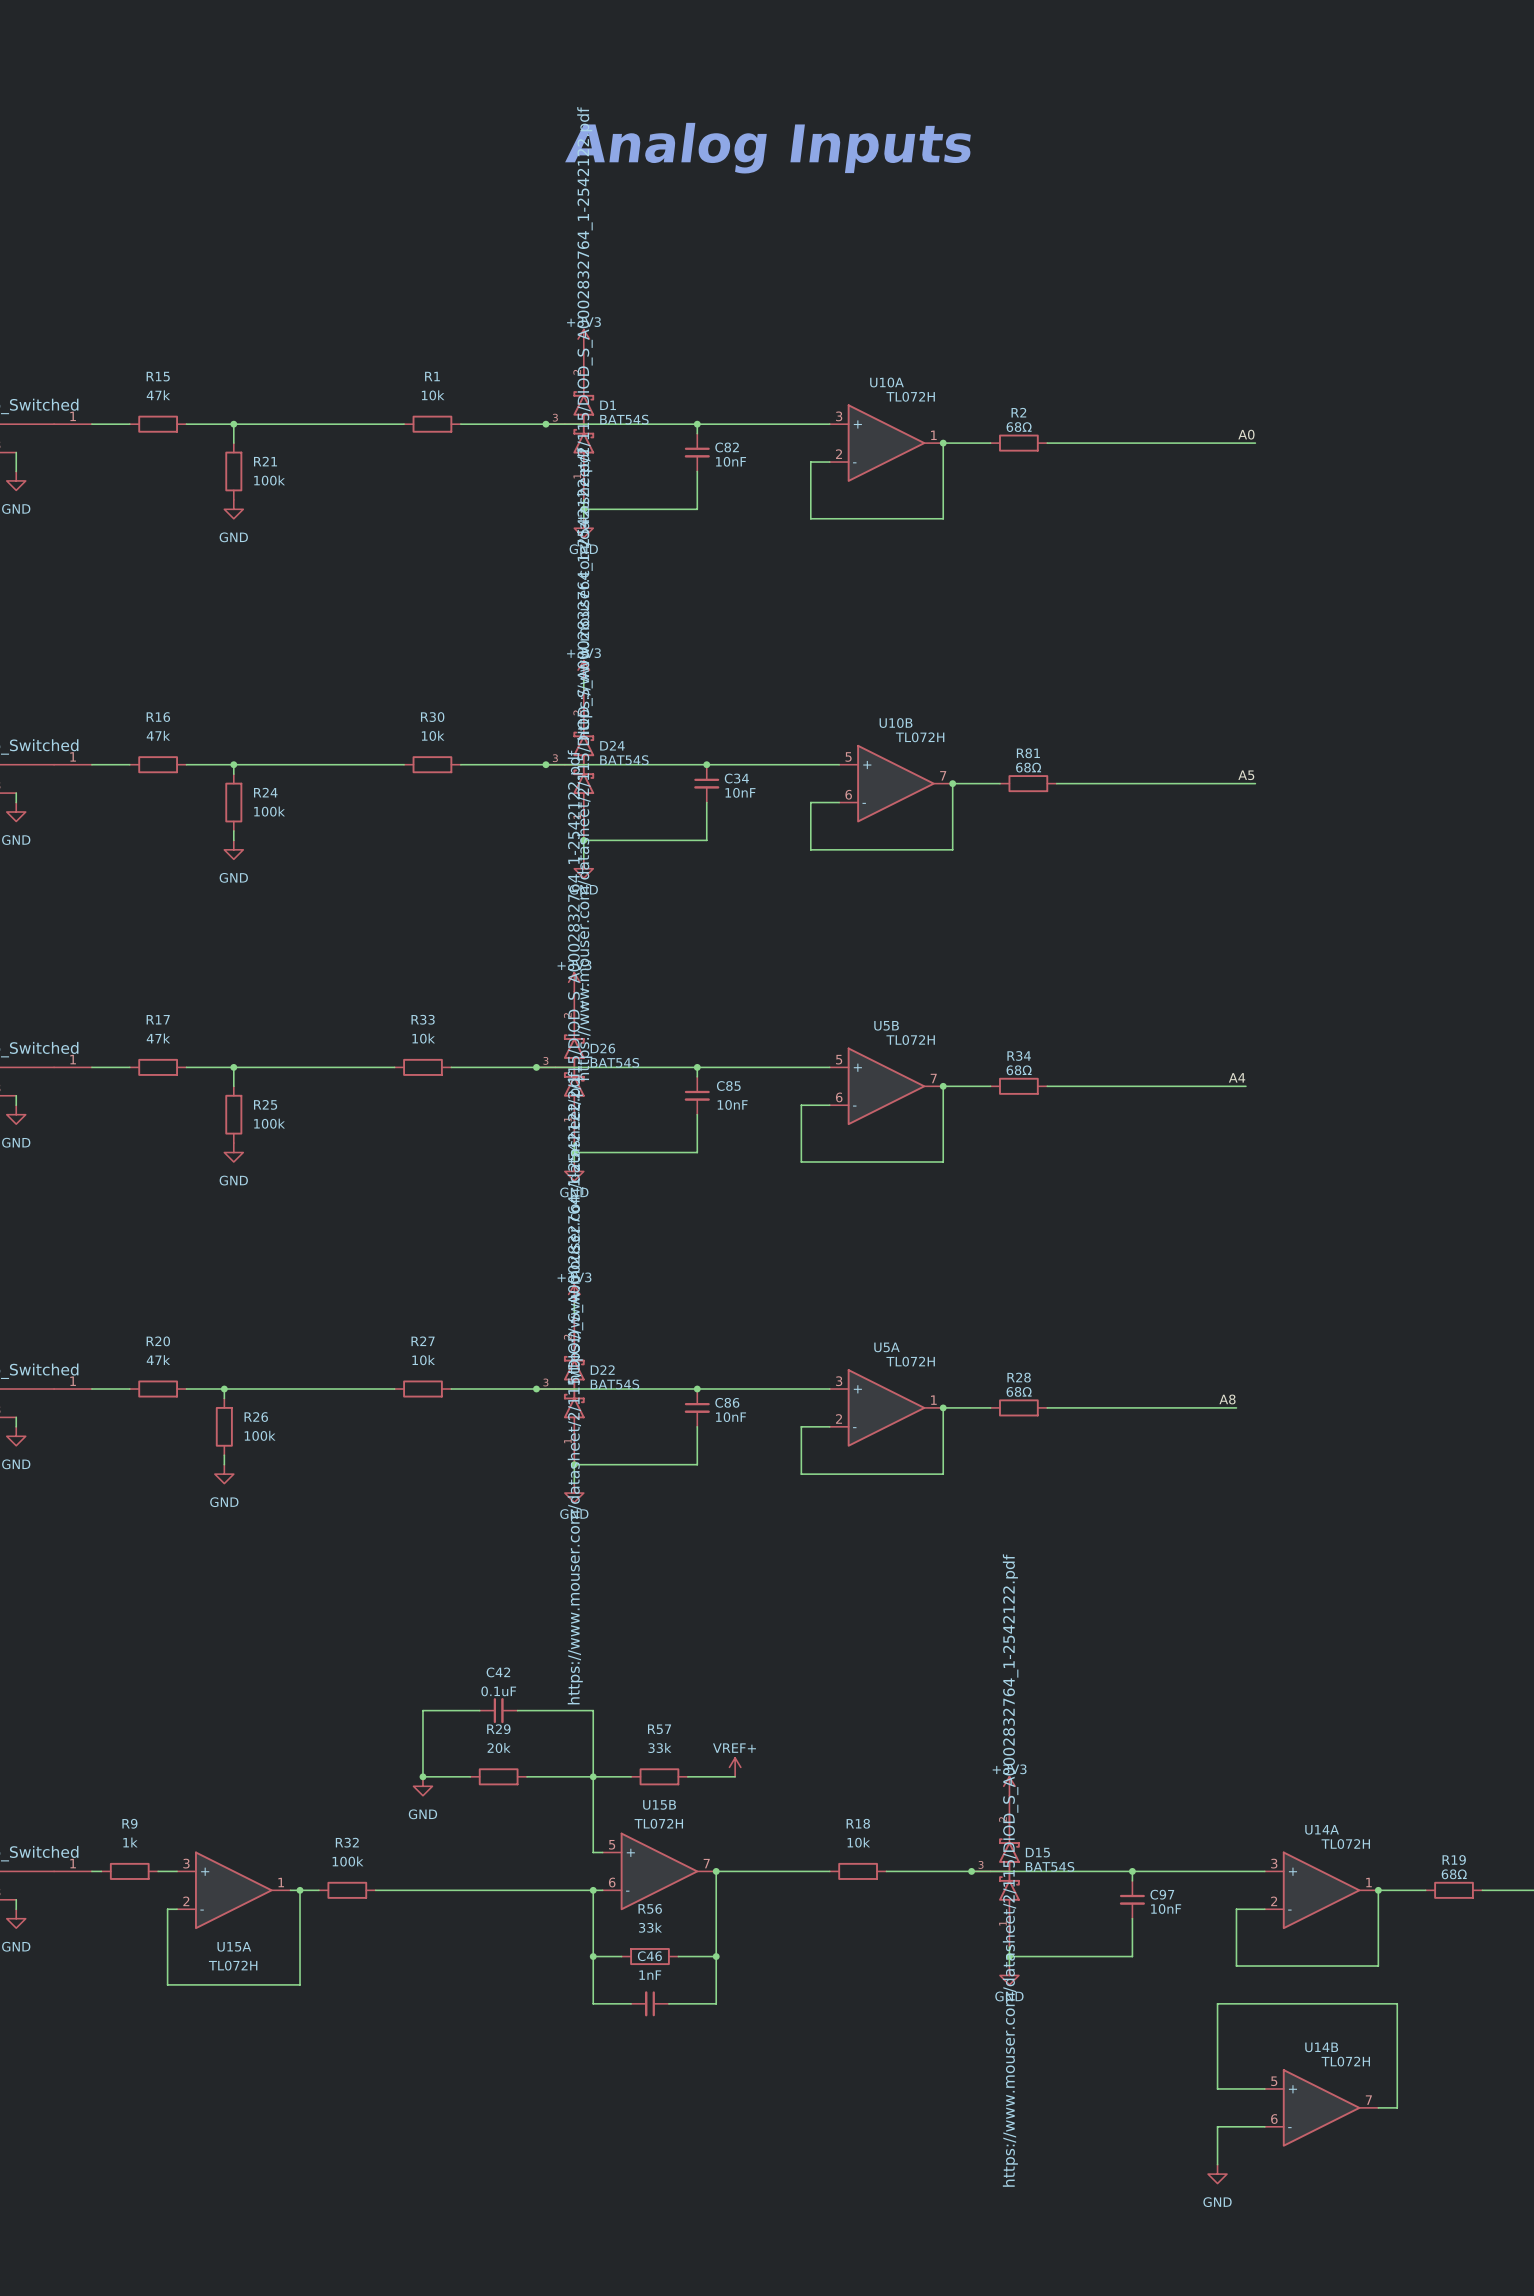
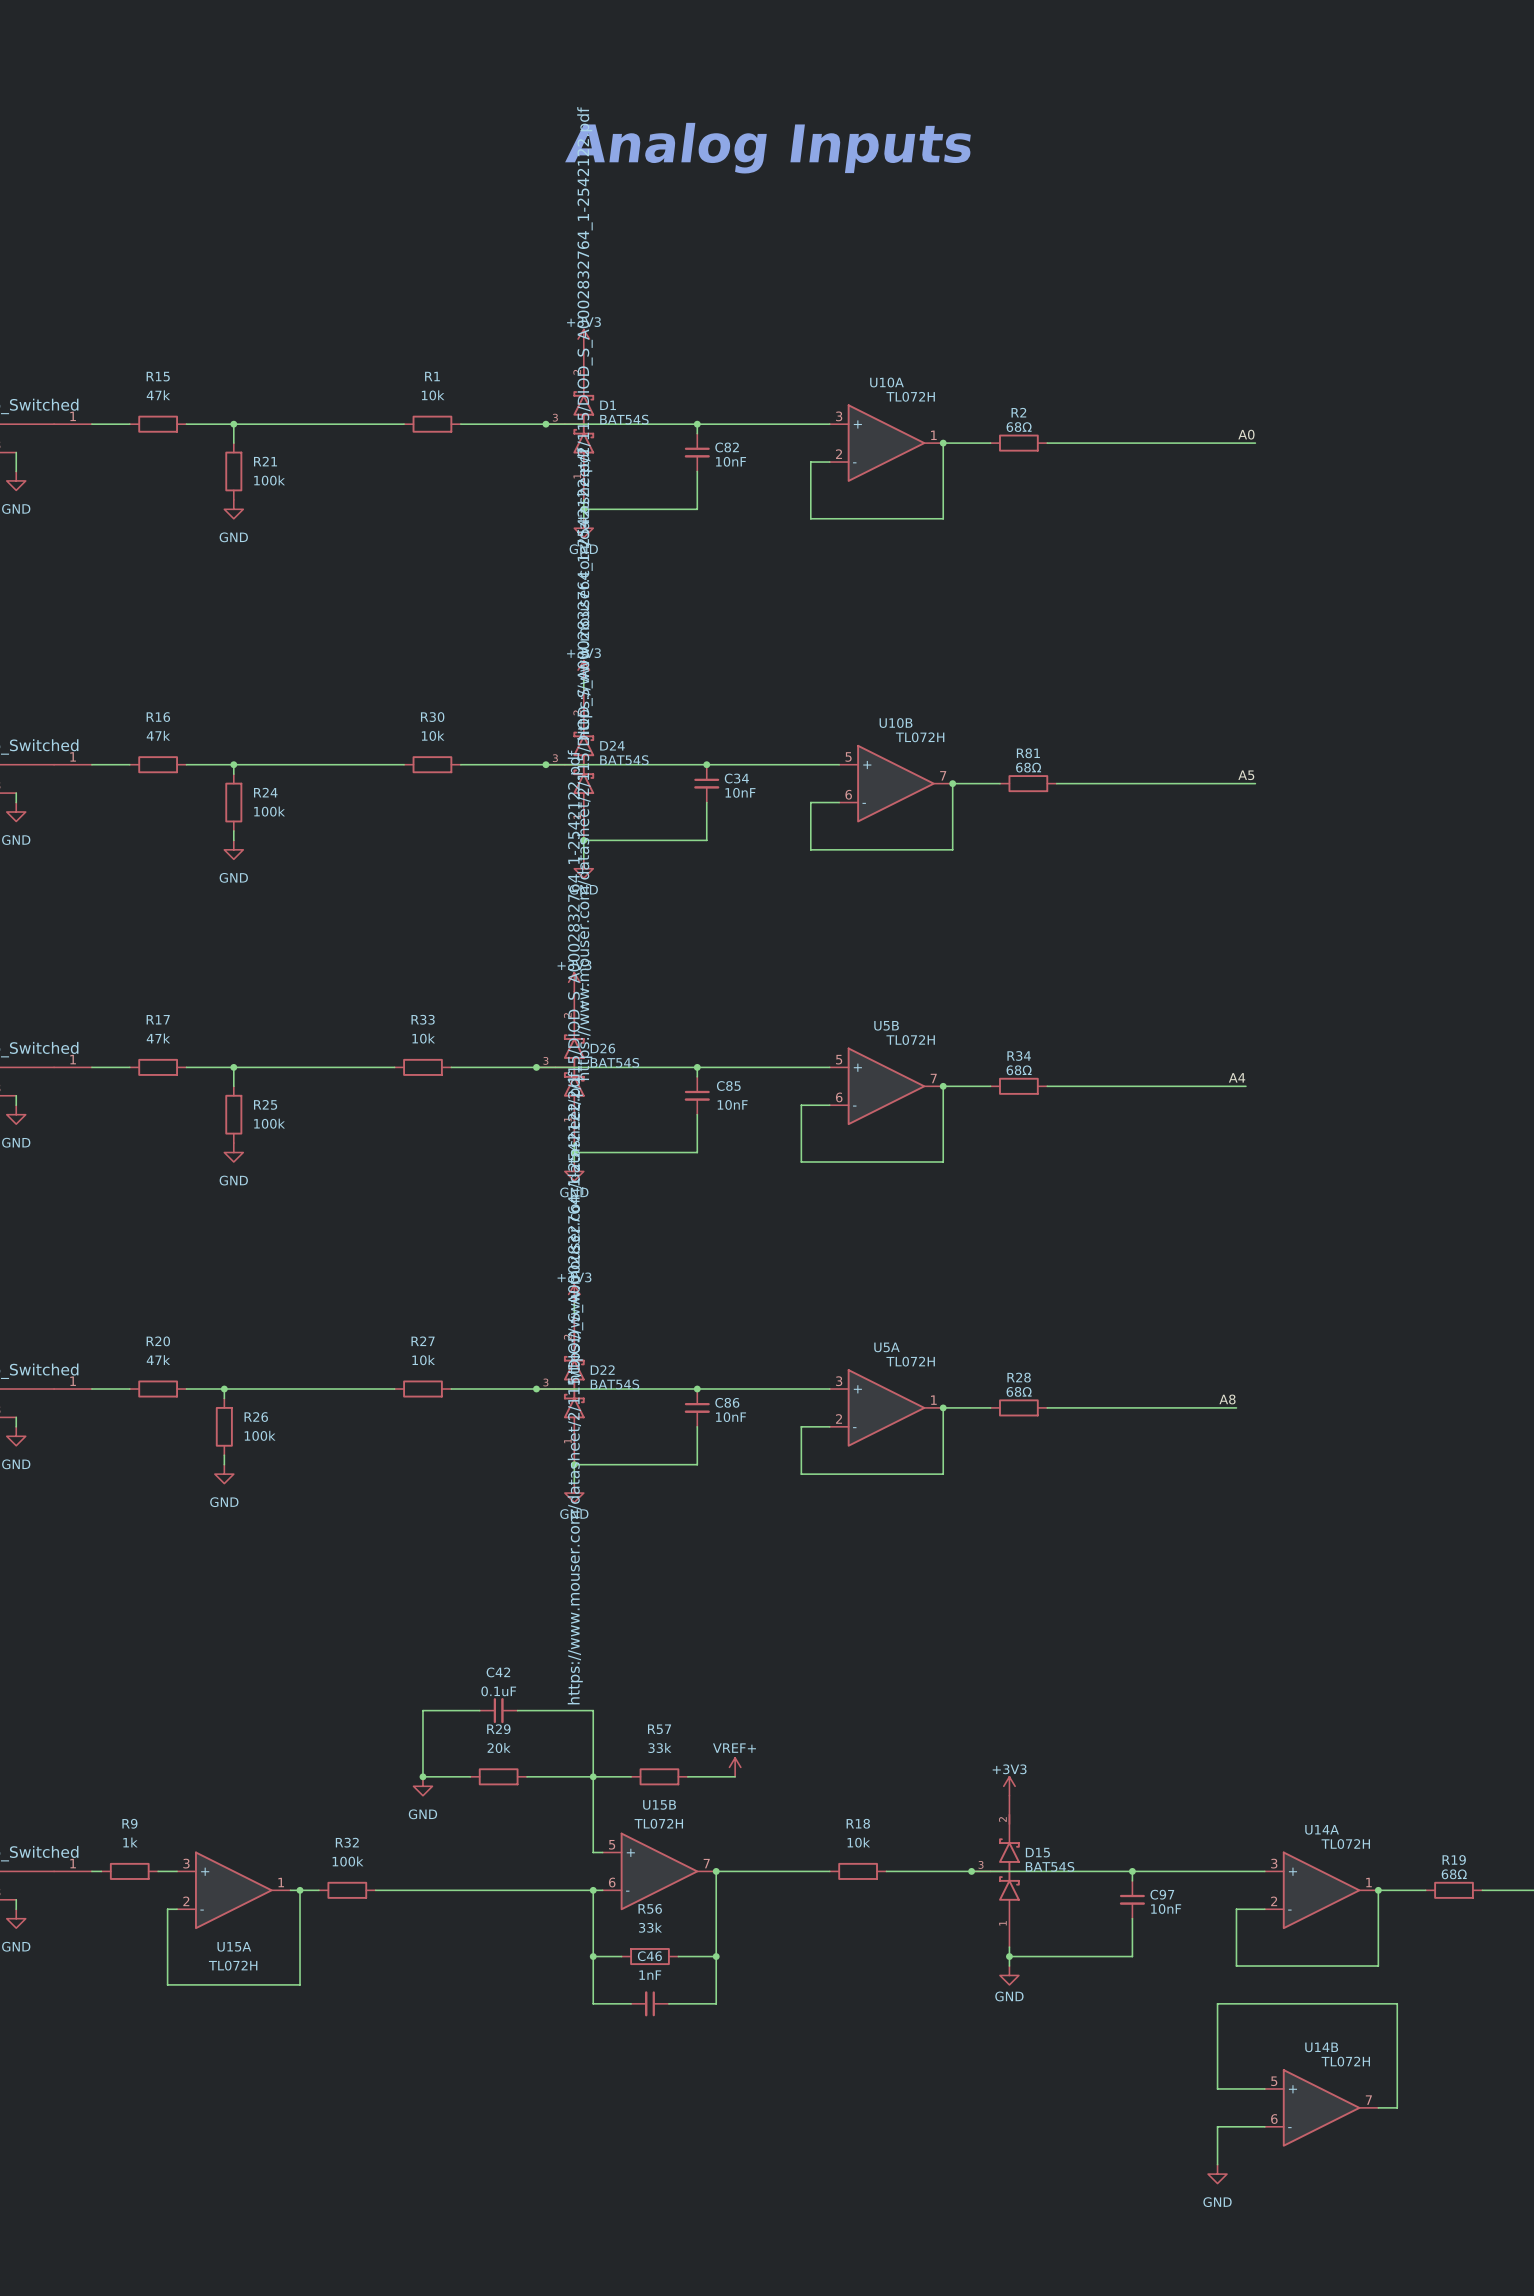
D15 text: https://www.mouser.com/datasheet/2/115/DIOD_S_A0002832764_1-2542122.pdf (1010, 1870) -> none

